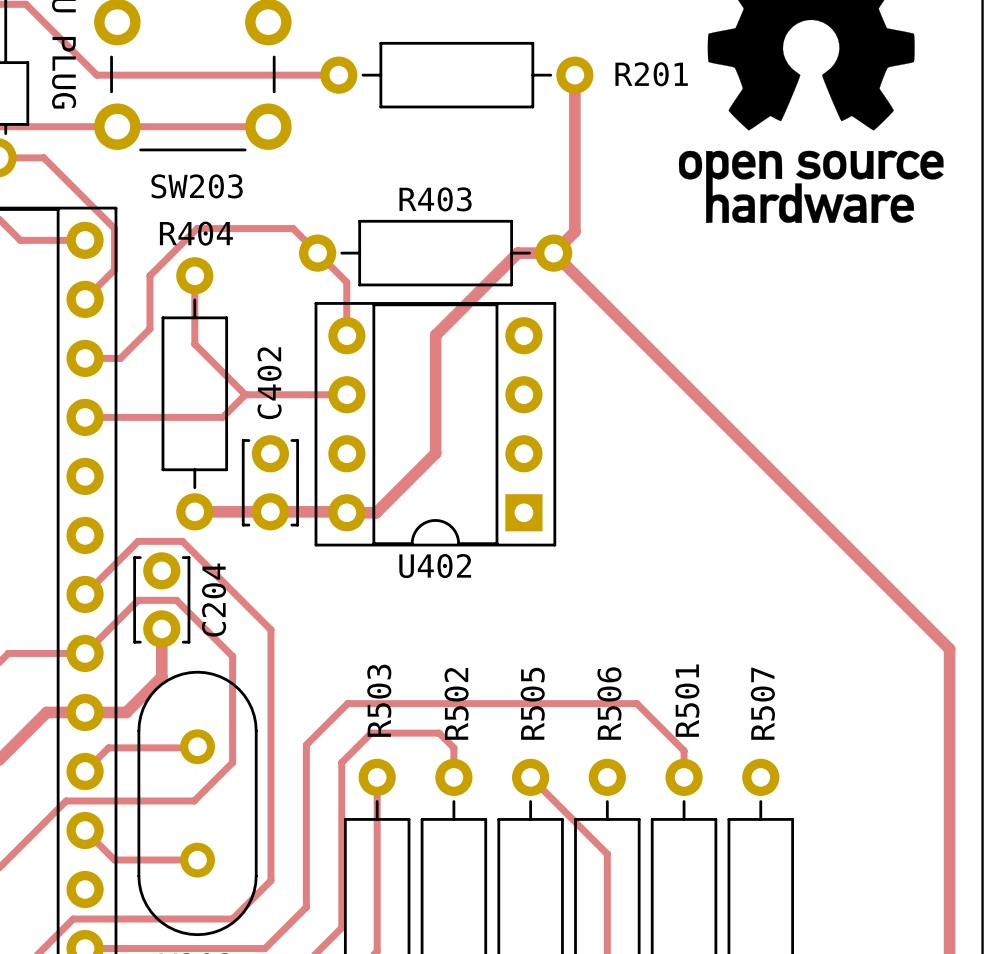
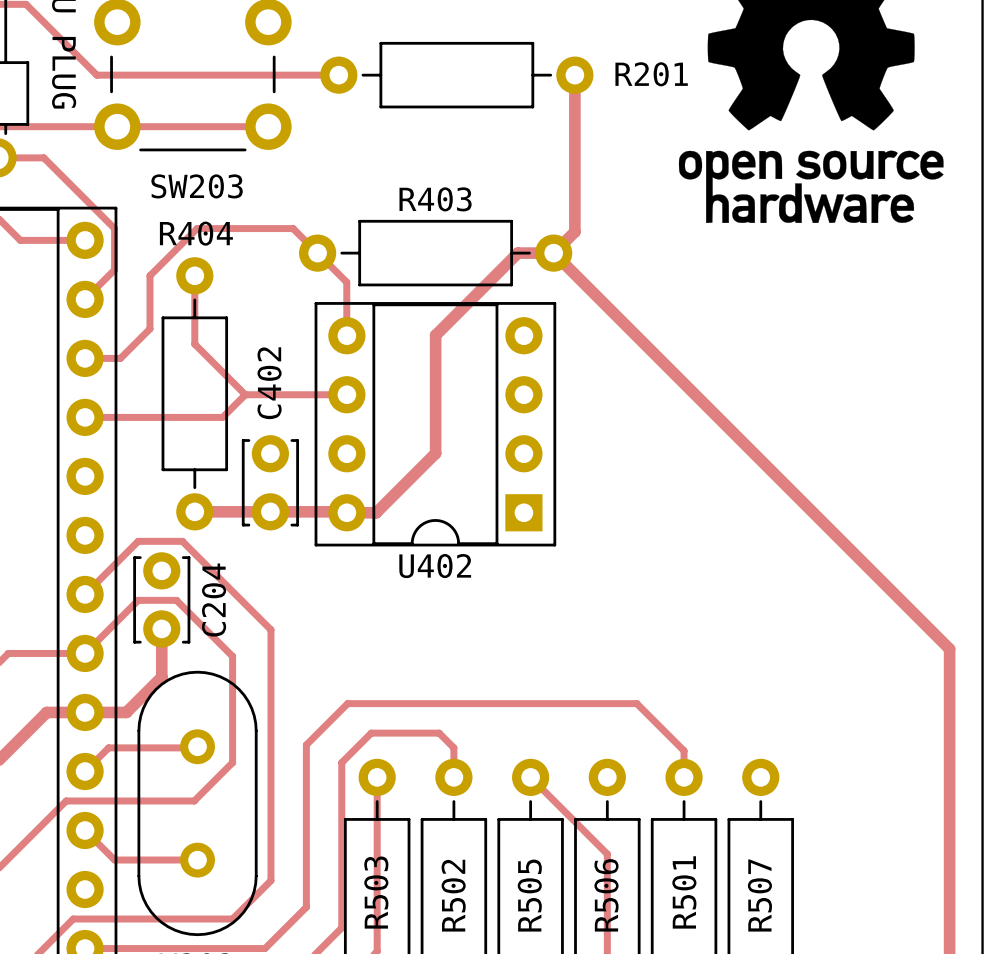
R503 name position: R503 (379, 700) -> R503 (376, 892)
R501 name position: R501 (687, 700) -> R501 (684, 892)
R502 name position: R502 (456, 703) -> R502 (453, 895)
R505 name position: R505 (532, 703) -> R505 (529, 895)
R506 name position: R506 (609, 703) -> R506 (606, 895)
R507 name position: R507 (762, 703) -> R507 (759, 895)

